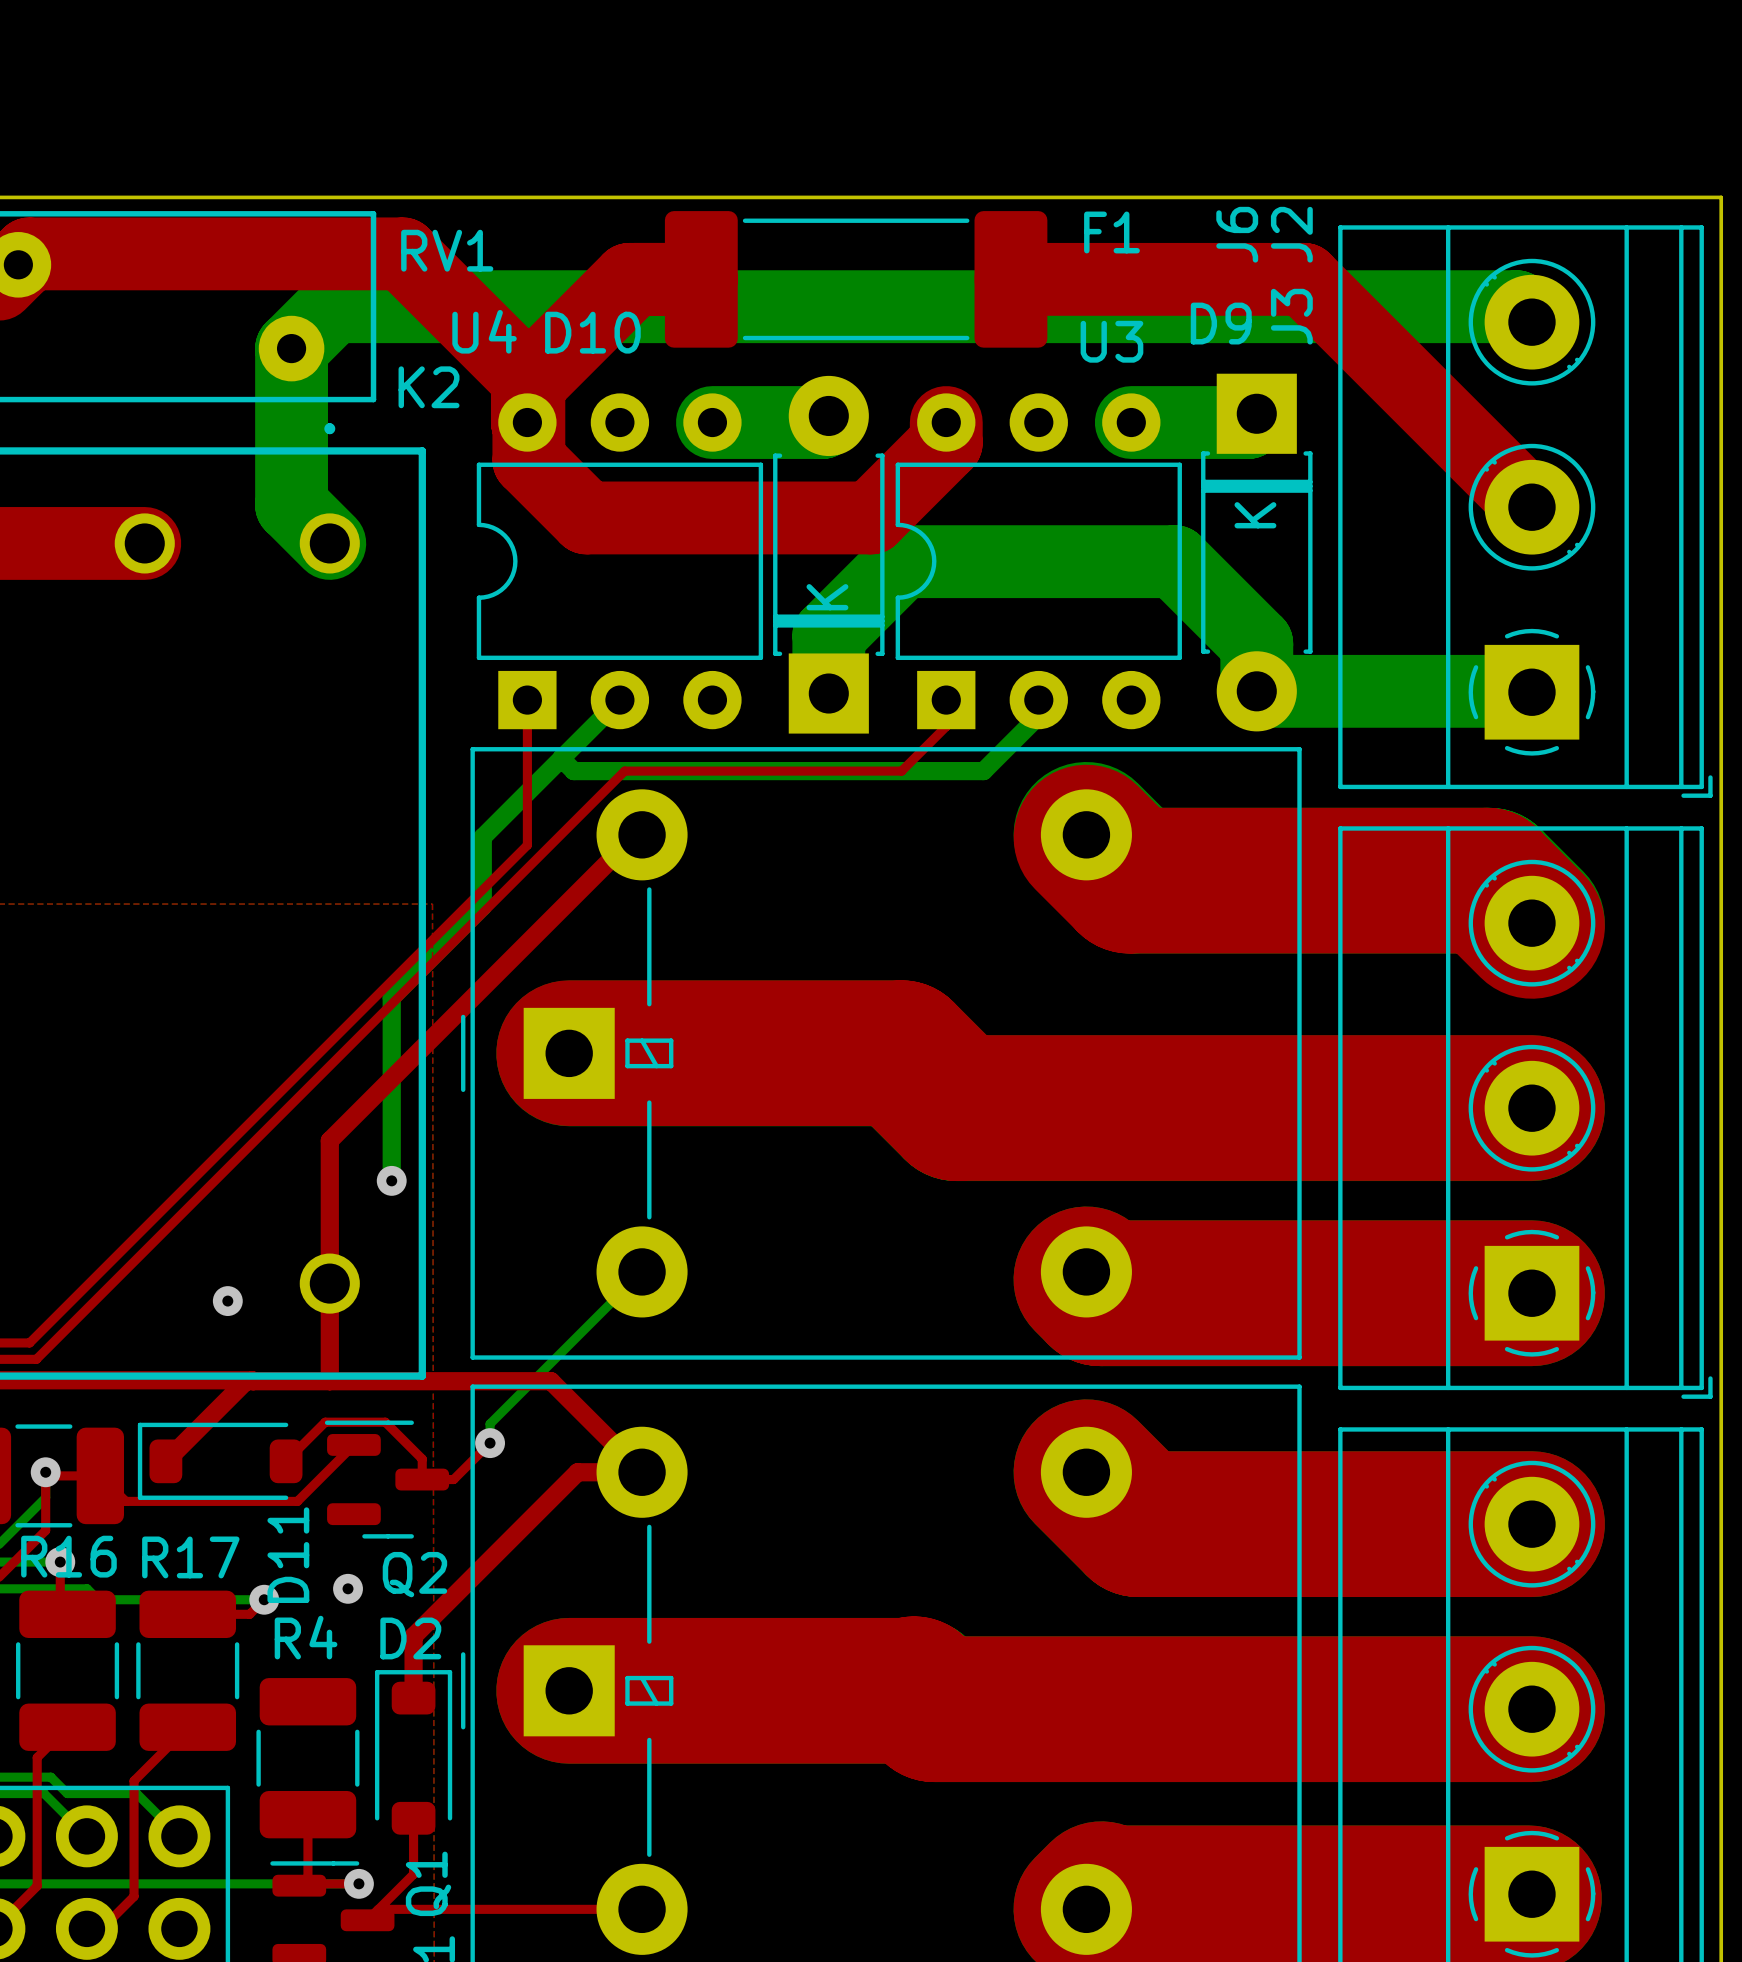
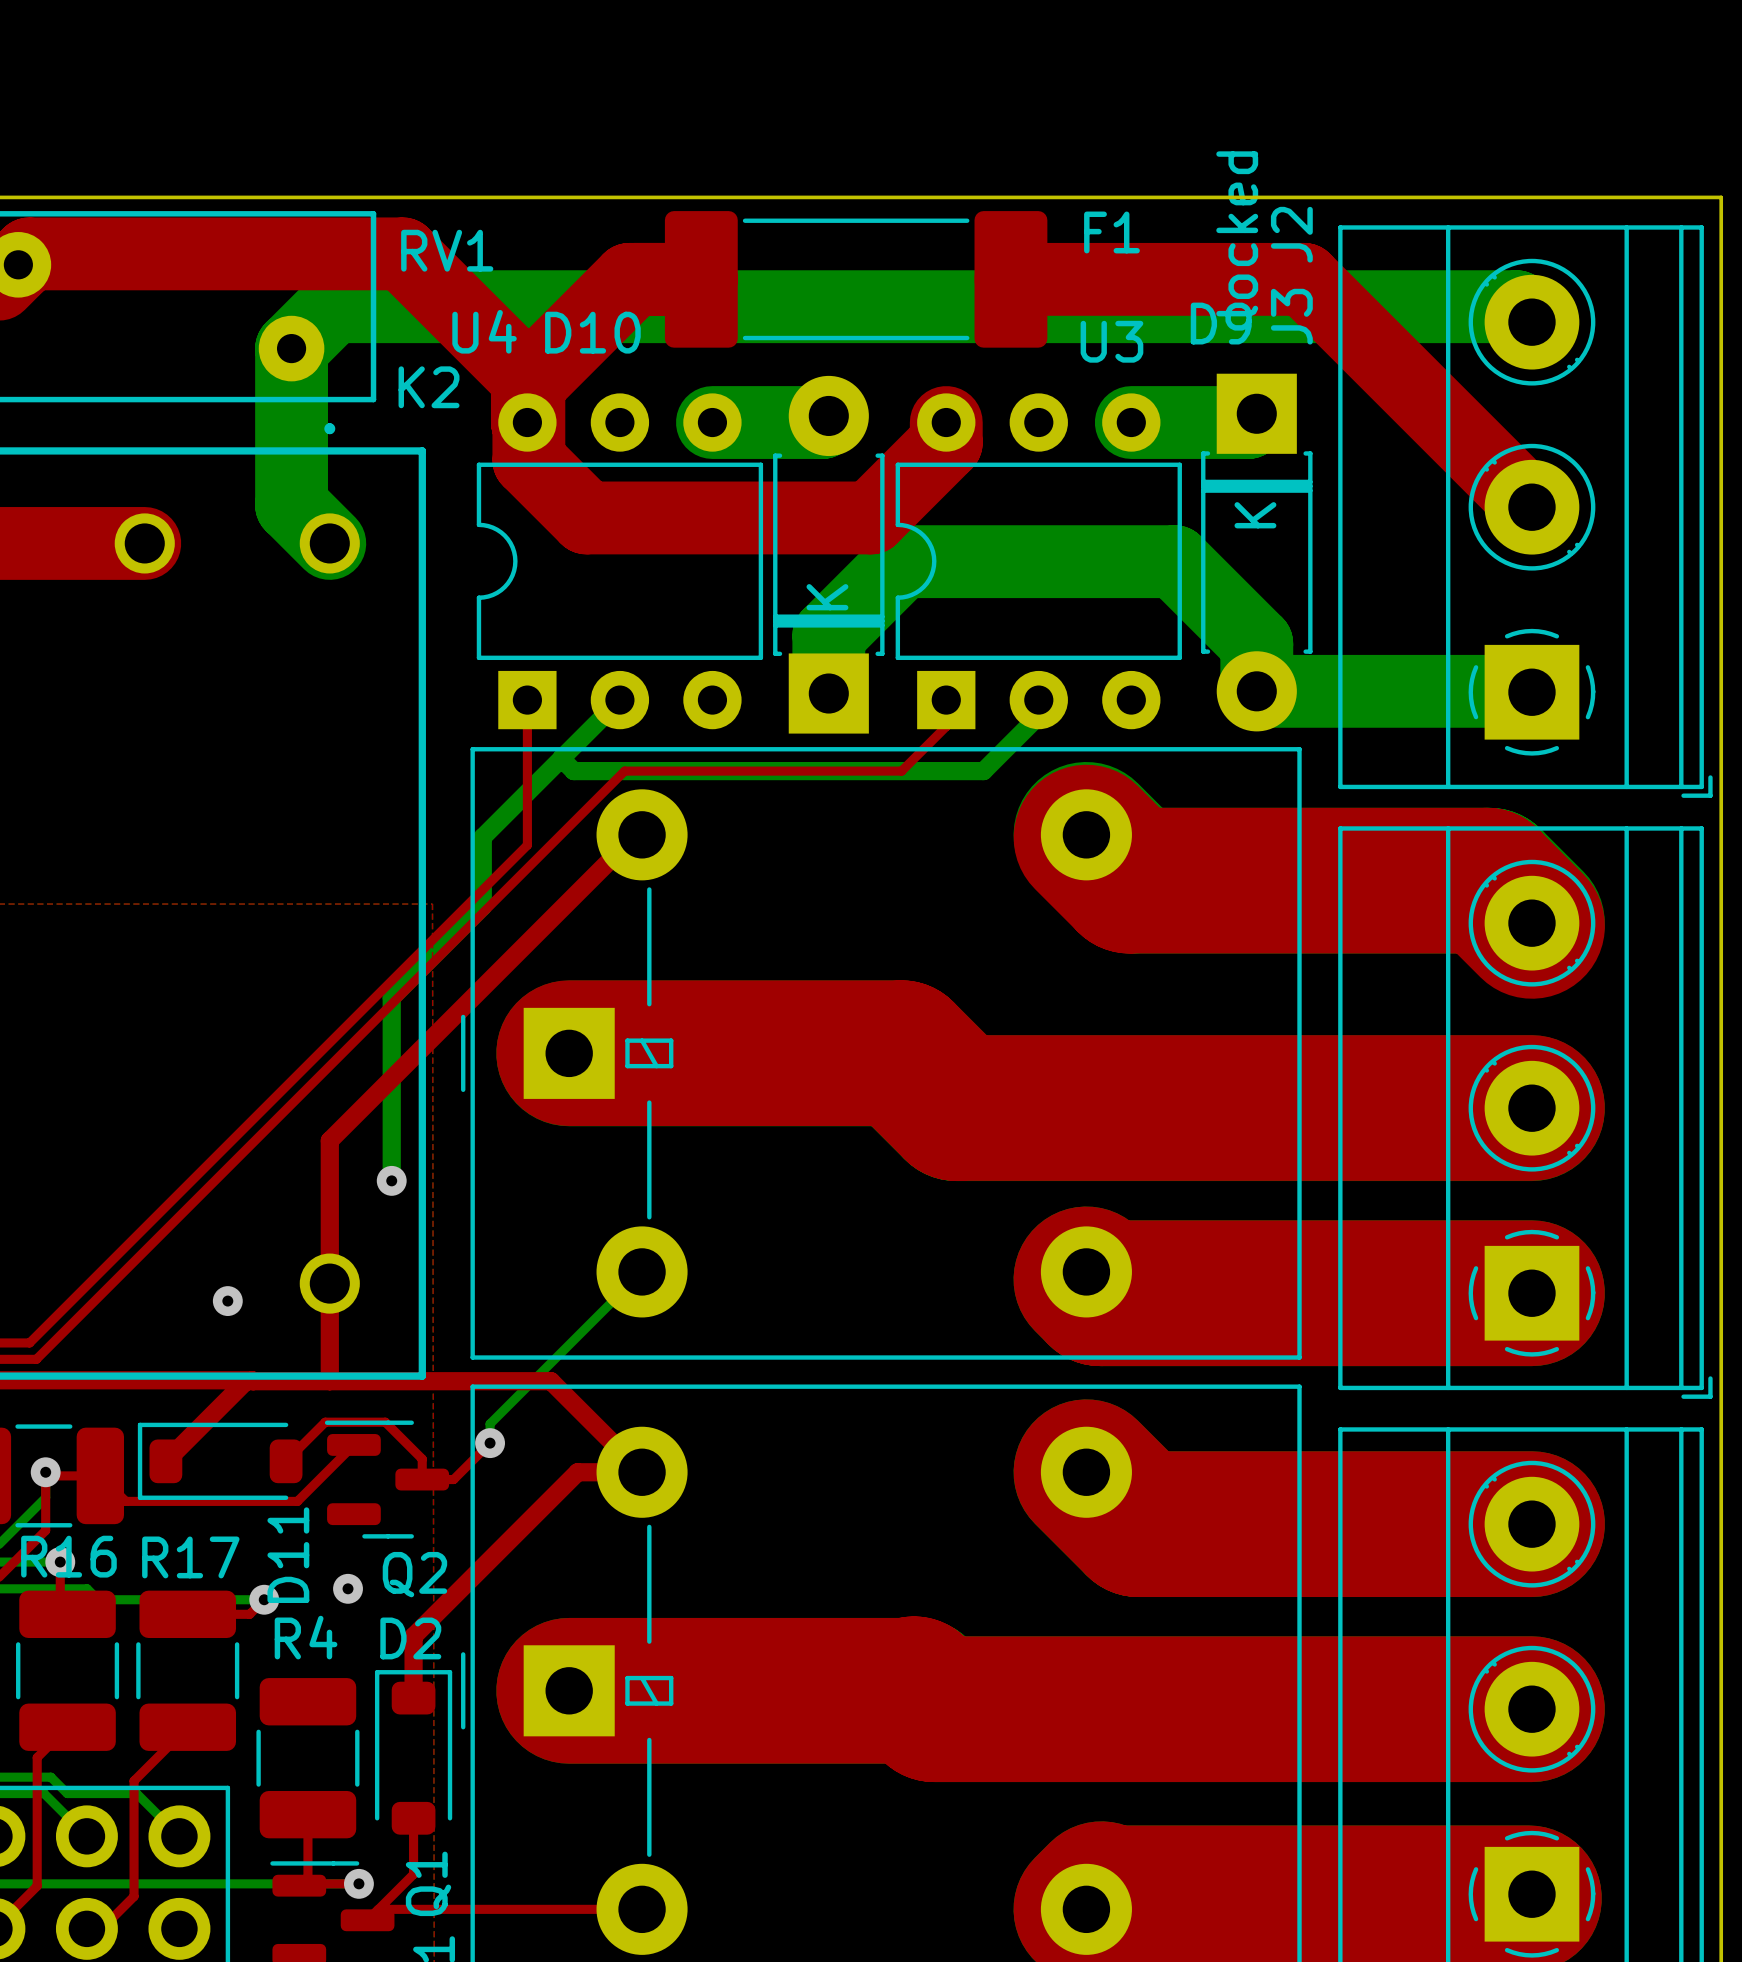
J6 name: J6 (1237, 234) -> locked (1237, 233)

